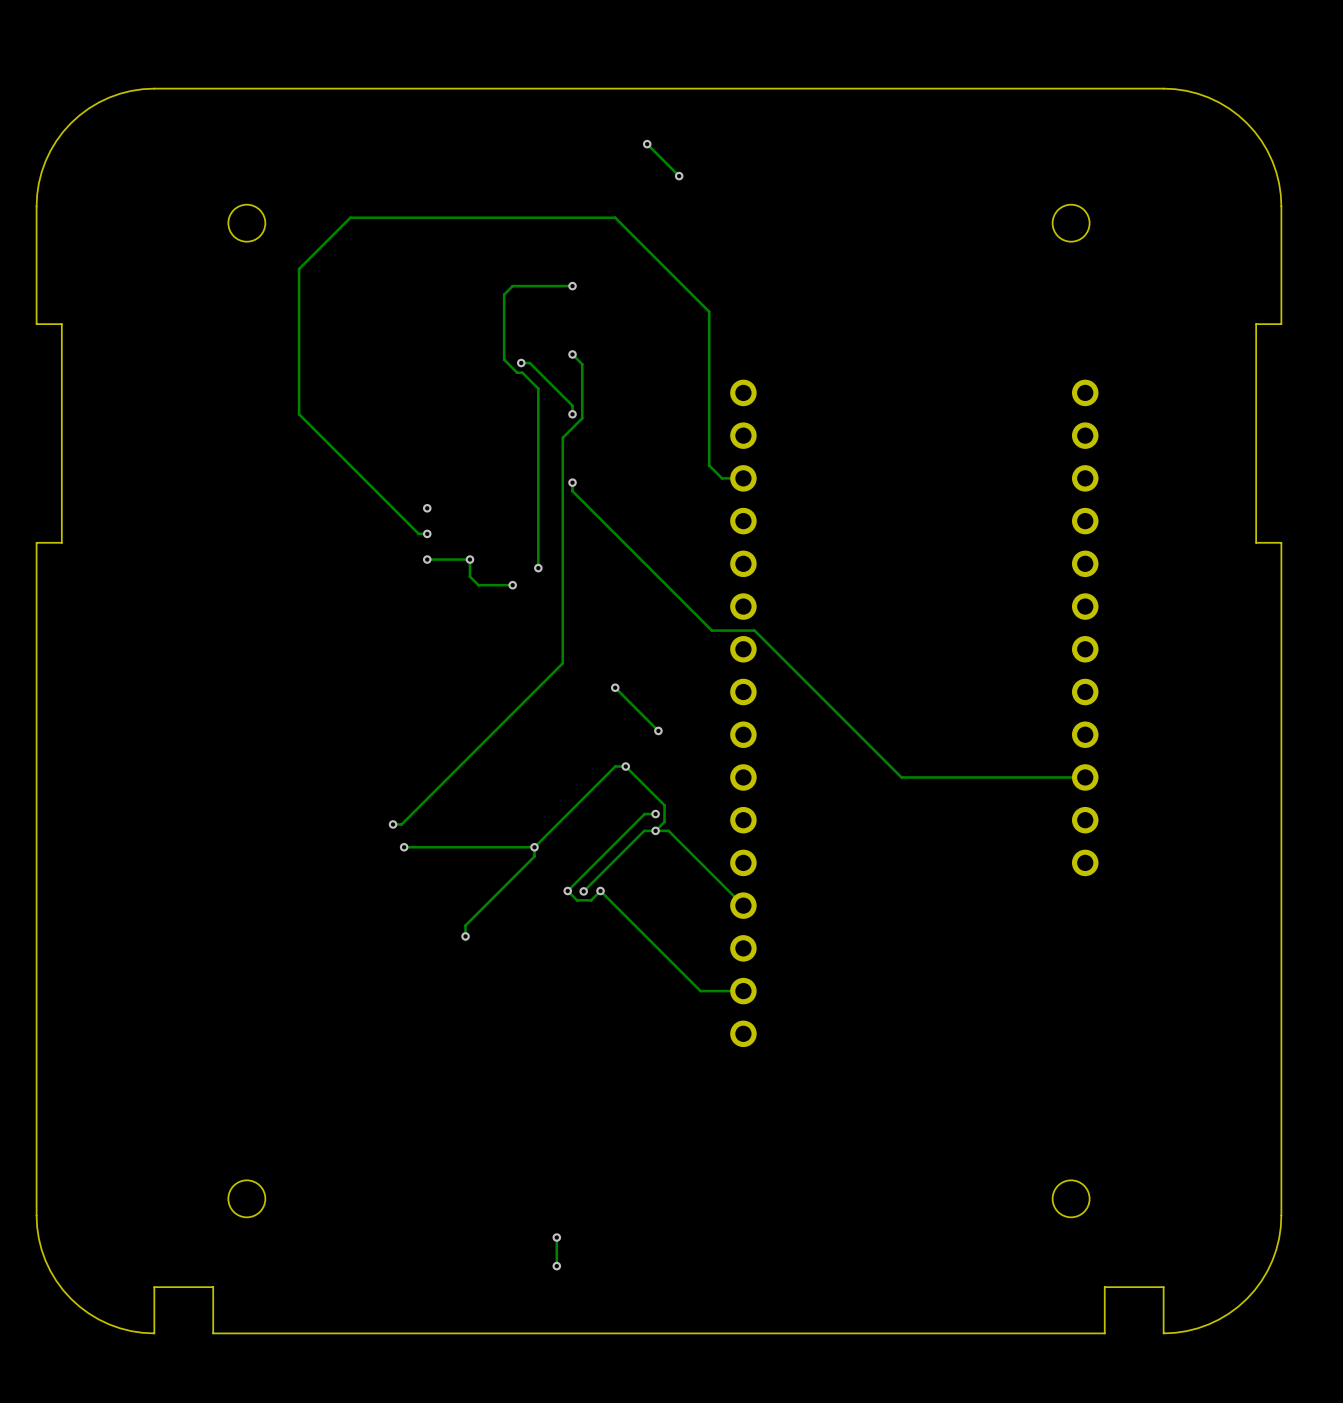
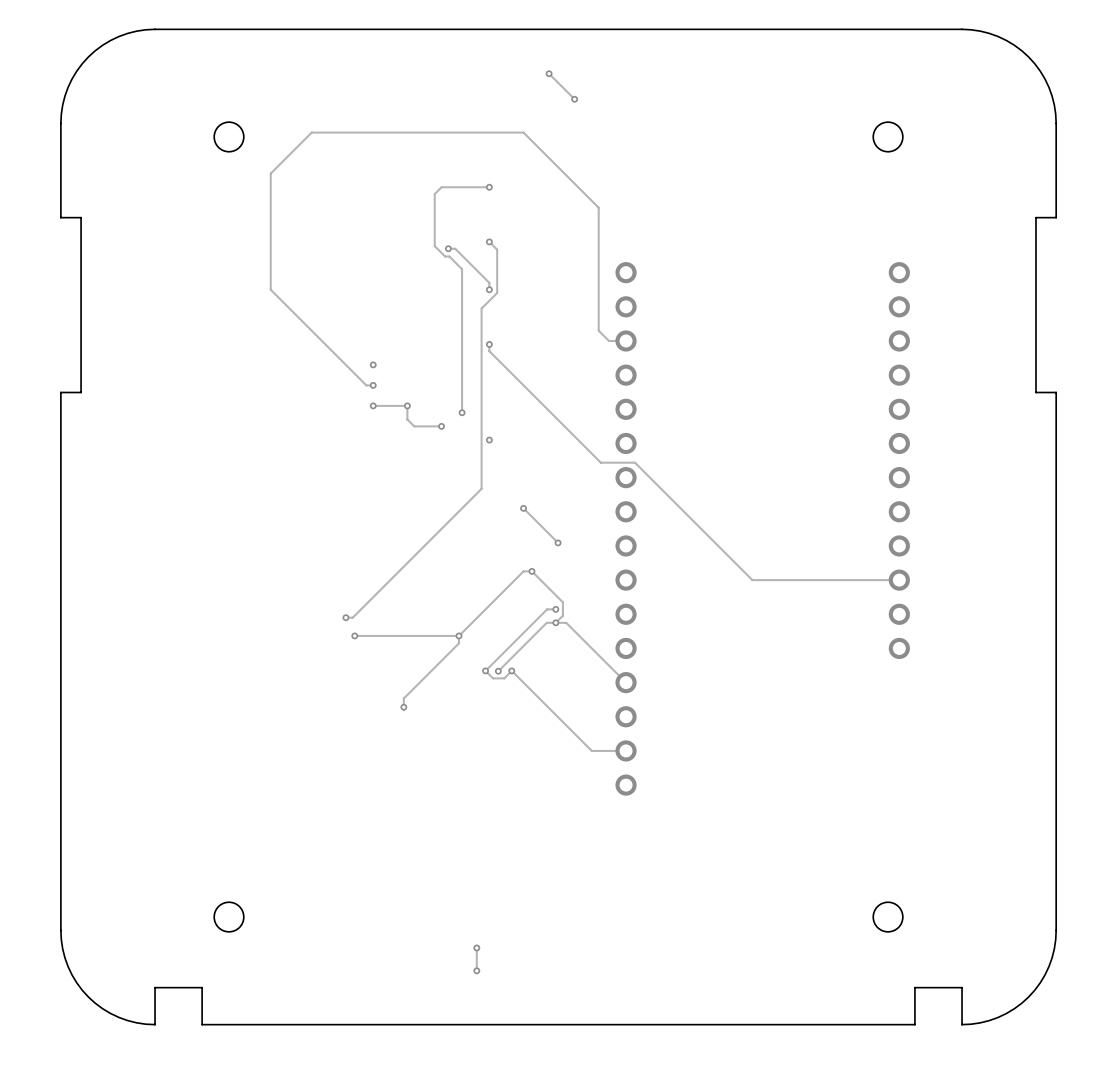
via: none -> (489, 440)

